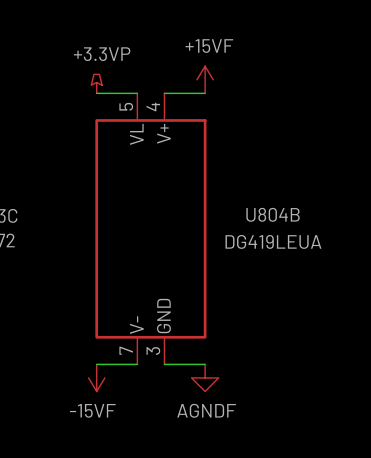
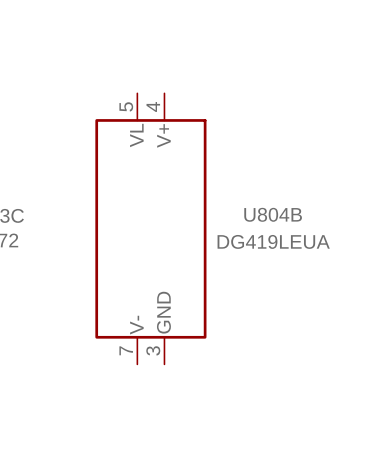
power symbol: +15VF (205, 79) -> none
power symbol: +3.3VP (96, 83) -> none
wire: (96, 93) (137, 93) -> none
wire: (164, 93) (205, 93) -> none
wire: (96, 364) (137, 364) -> none
wire: (164, 364) (205, 364) -> none
power symbol: -15VF (96, 377) -> none
power symbol: AGNDF (205, 377) -> none

